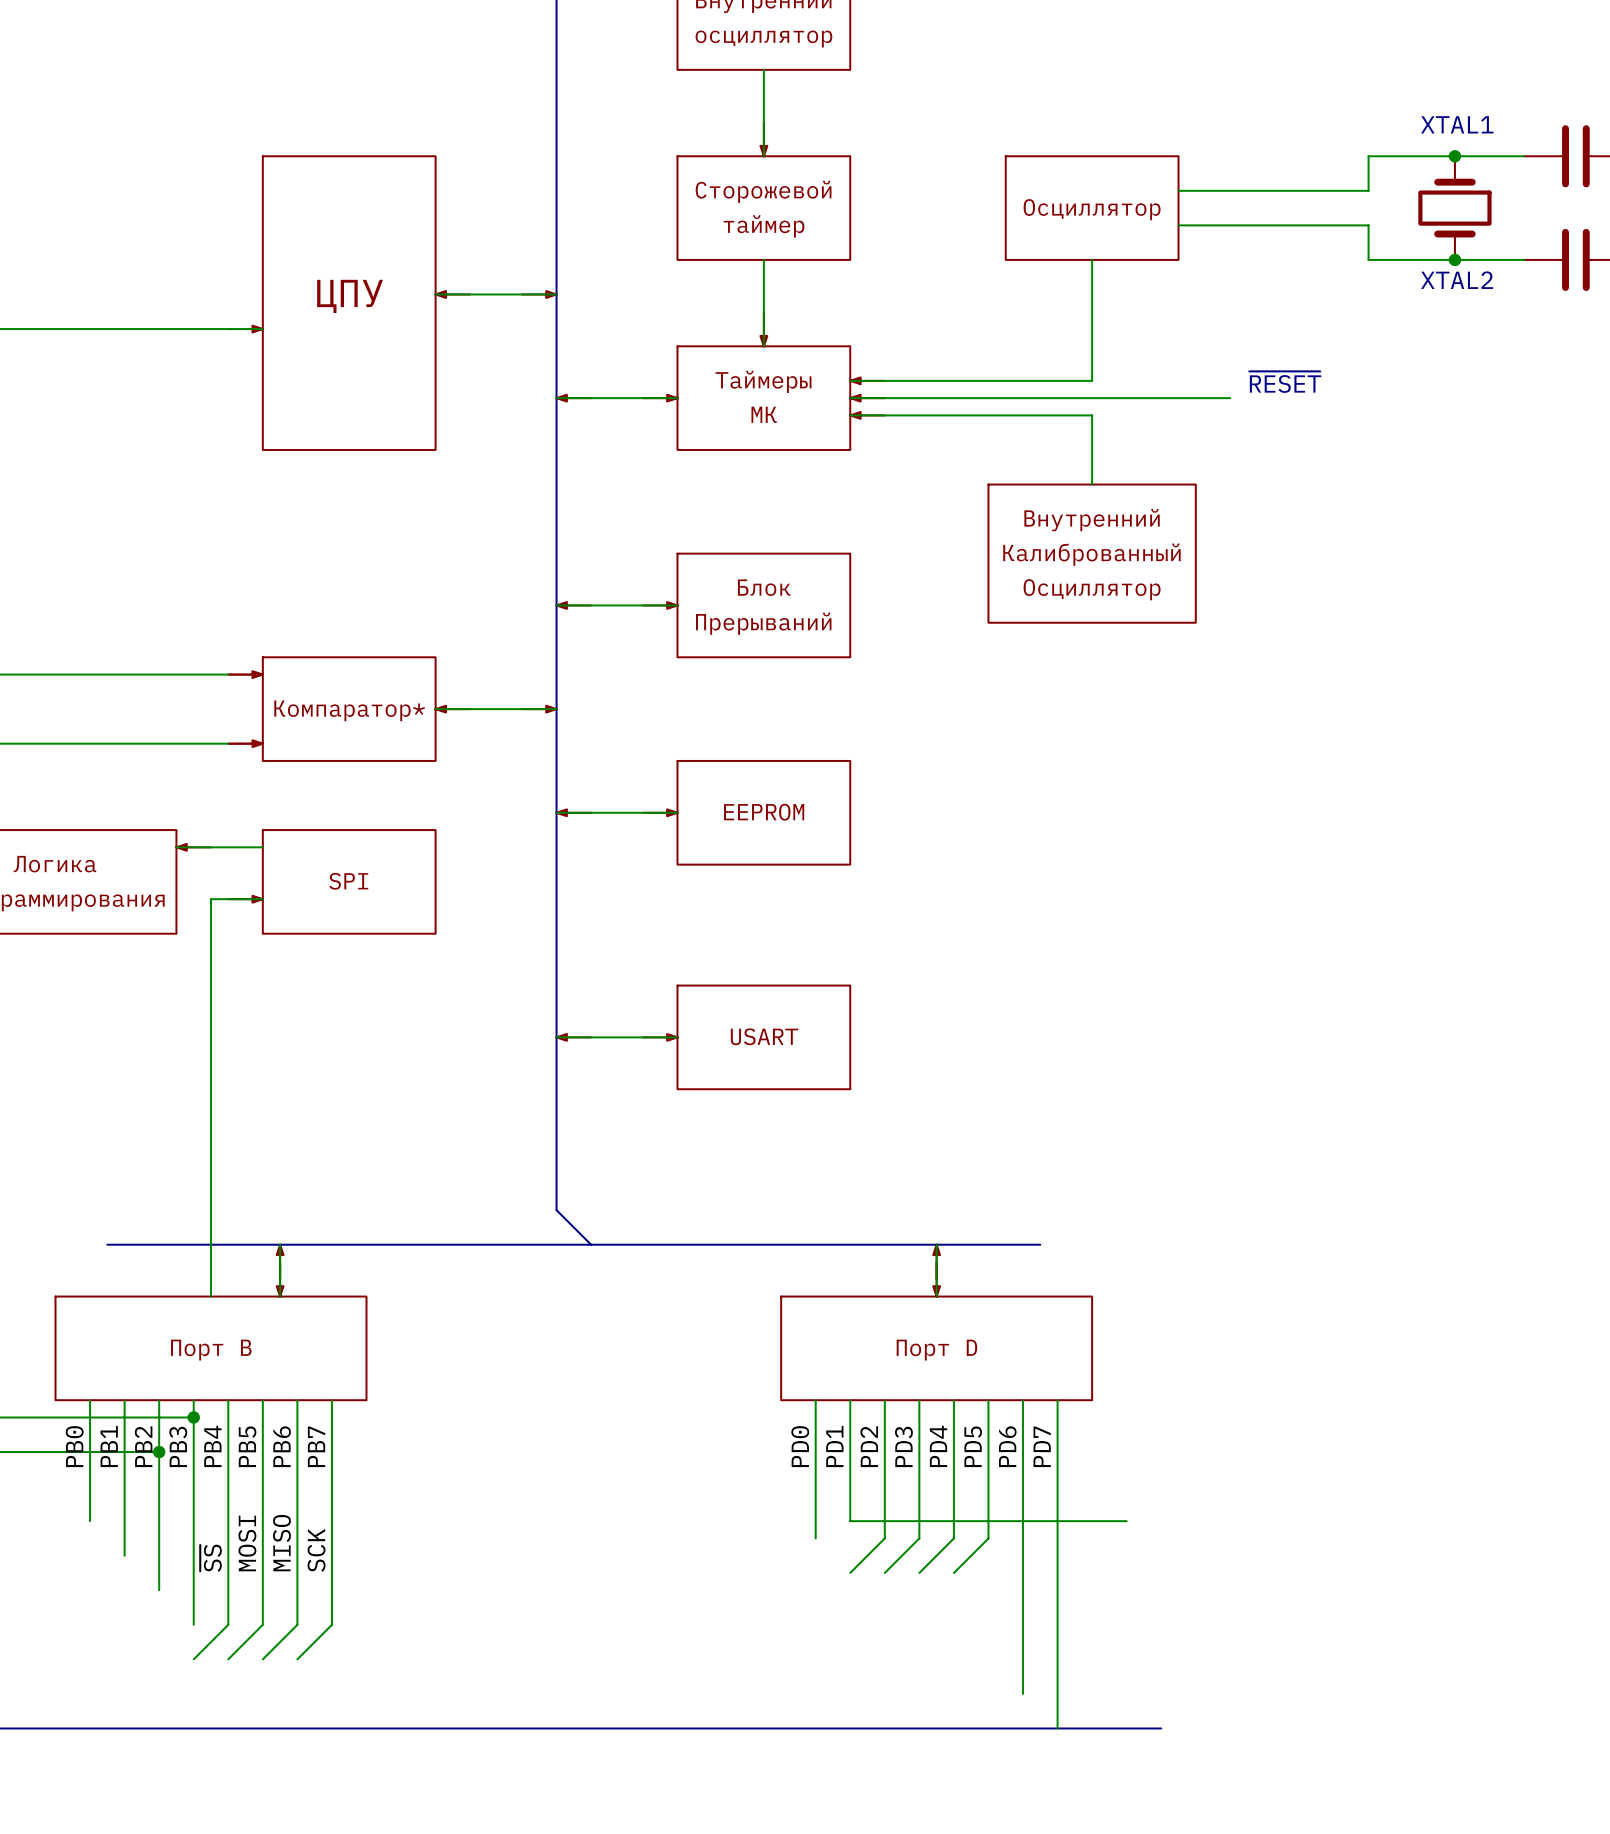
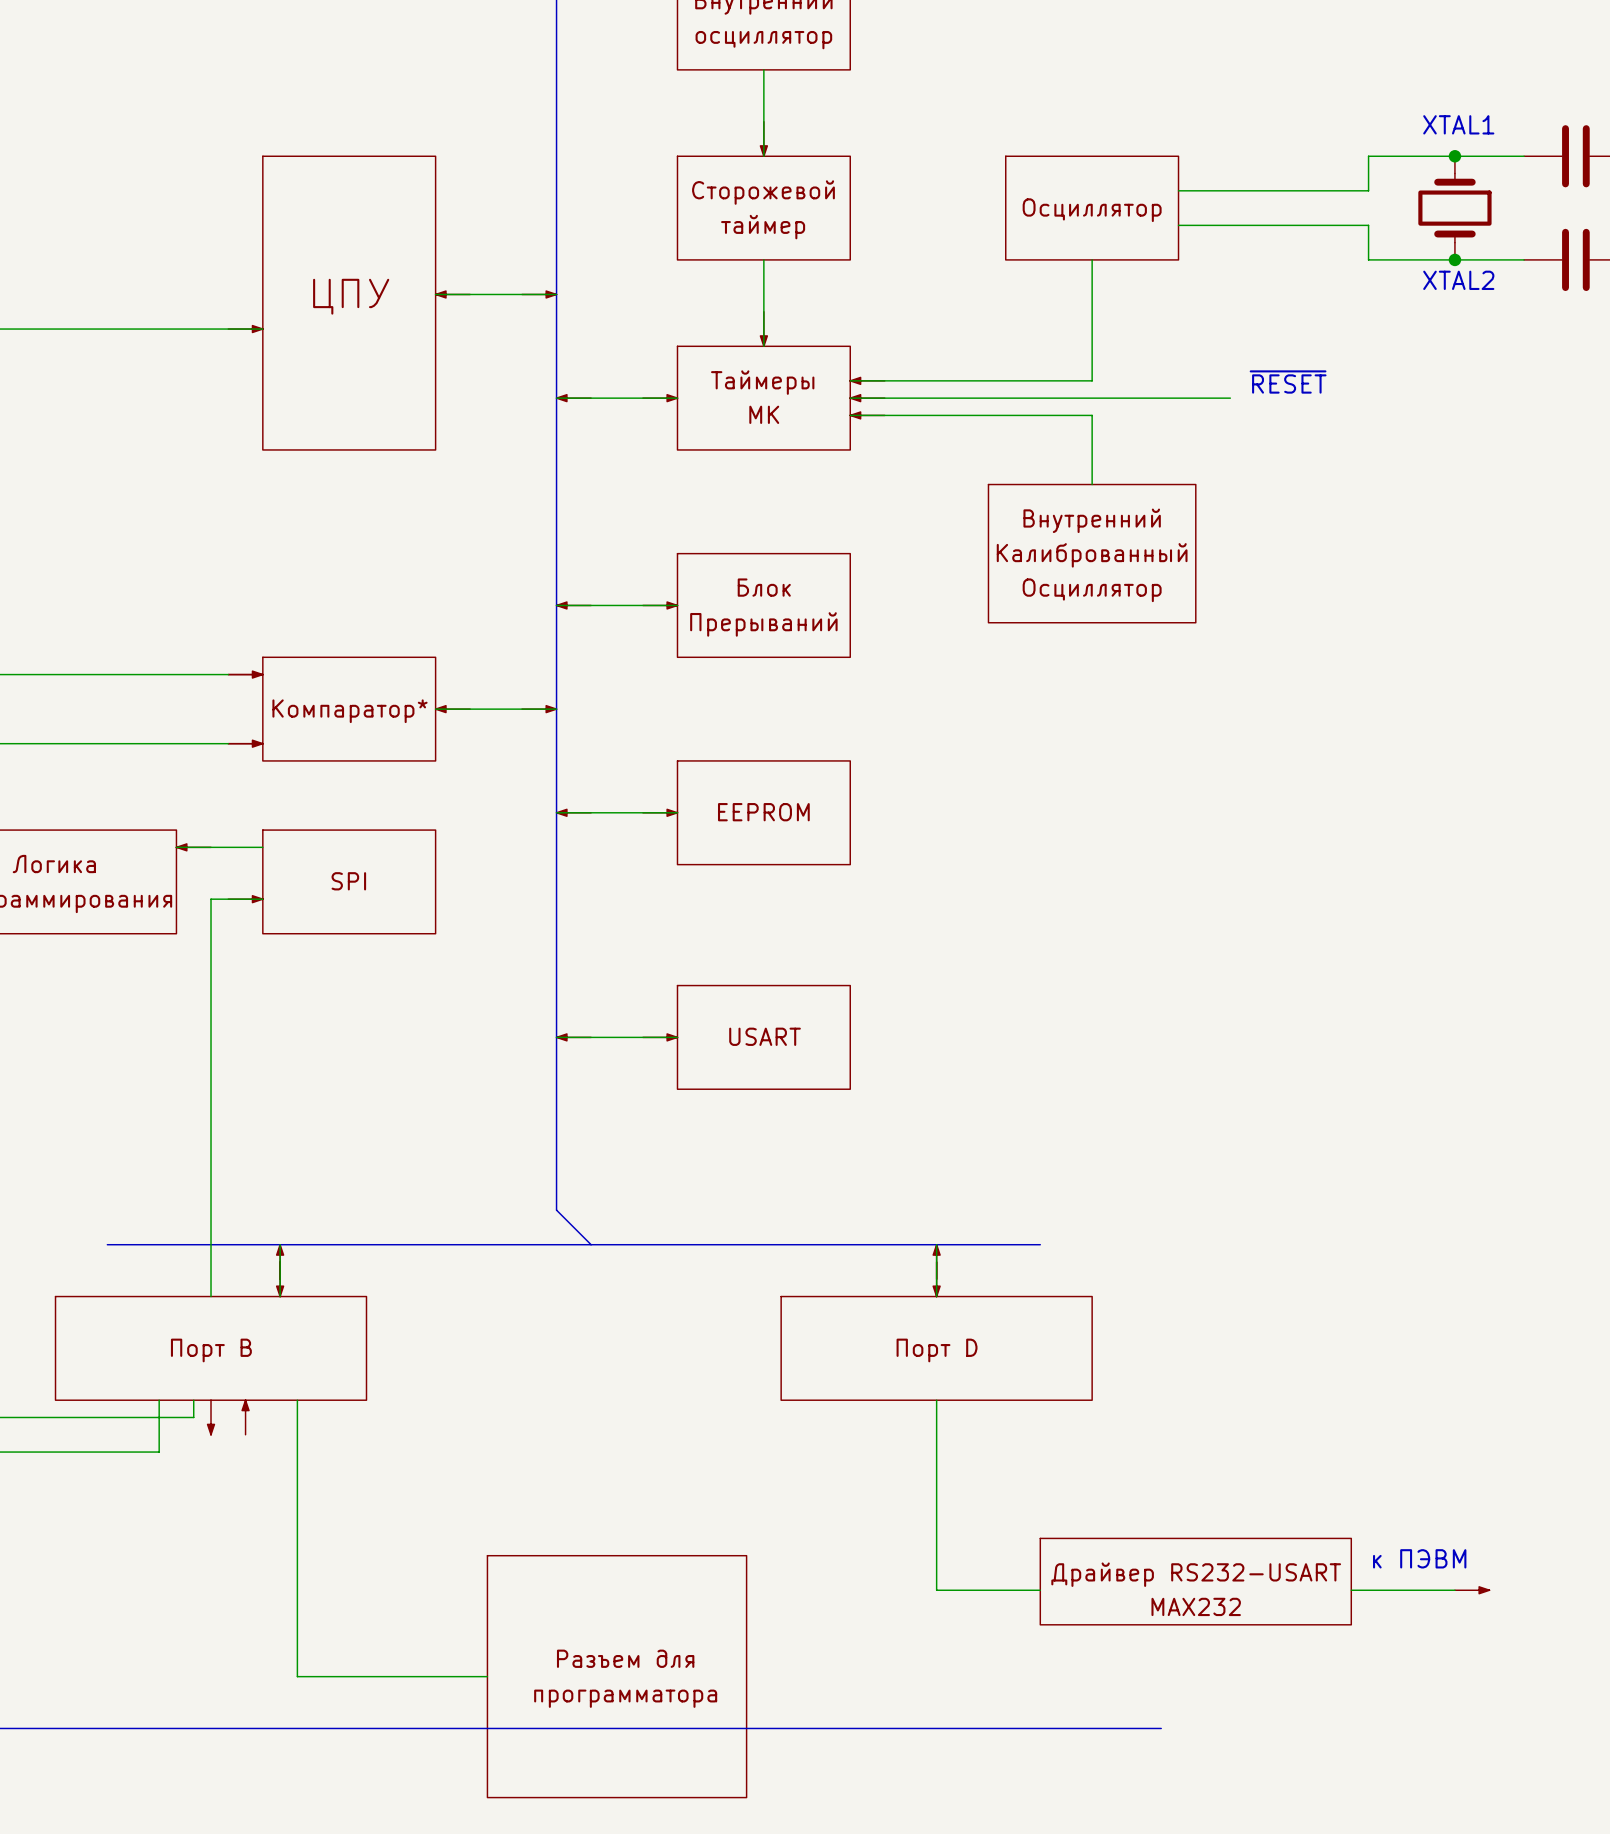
wire: (90, 1400) (90, 1521) -> none
wire: (124, 1400) (124, 1555) -> none
wire: (228, 1400) (228, 1624) (193, 1659) -> none
wire: (262, 1400) (262, 1624) (228, 1659) -> none
wire: (331, 1400) (331, 1624) (297, 1659) -> none
wire: (815, 1400) (815, 1538) -> none
wire: (850, 1400) (850, 1521) (1126, 1521) -> none
wire: (884, 1400) (884, 1538) (850, 1572) -> none
wire: (919, 1400) (919, 1538) (884, 1572) -> none
wire: none -> (936, 1400) (936, 1590) (1040, 1590)
wire: (953, 1400) (953, 1538) (919, 1572) -> none
wire: (988, 1400) (988, 1538) (953, 1572) -> none
wire: (1023, 1400) (1023, 1693) -> none
wire: (1057, 1400) (1057, 1728) -> none
wire: (193, 1417) (193, 1624) -> none
junction: (193, 1417) -> none
power symbol: none -> (211, 1417)
power symbol: none -> (245, 1417)
label: PB0 (74, 1446) -> none
label: PB1 (109, 1446) -> none
label: PB2 (143, 1446) -> none
label: PB3 (178, 1446) -> none
label: PB4 (212, 1446) -> none
label: PB5 (247, 1446) -> none
label: PB6 (282, 1446) -> none
label: PB7 (316, 1446) -> none
label: PD0 (800, 1446) -> none
label: PD1 (834, 1446) -> none
label: PD2 (869, 1446) -> none
label: PD3 (903, 1446) -> none
label: PD4 (938, 1446) -> none
label: PD5 (973, 1446) -> none
label: PD6 (1007, 1446) -> none
label: PD7 (1042, 1446) -> none
wire: (159, 1452) (159, 1590) -> none
junction: (159, 1452) -> none
label: MOSI (247, 1543) -> none
label: MISO (281, 1543) -> none
label: SCK (316, 1550) -> none
label: ~{SS} (211, 1558) -> none
text: none -> к ПЭВМ (1419, 1558)
part: none -> (1195, 1581)
wire: none -> (1351, 1590) (1454, 1590)
power symbol: none -> (1472, 1590)
wire: (297, 1624) (262, 1659) -> (297, 1624) (297, 1676) (487, 1676)
part: none -> (617, 1676)

